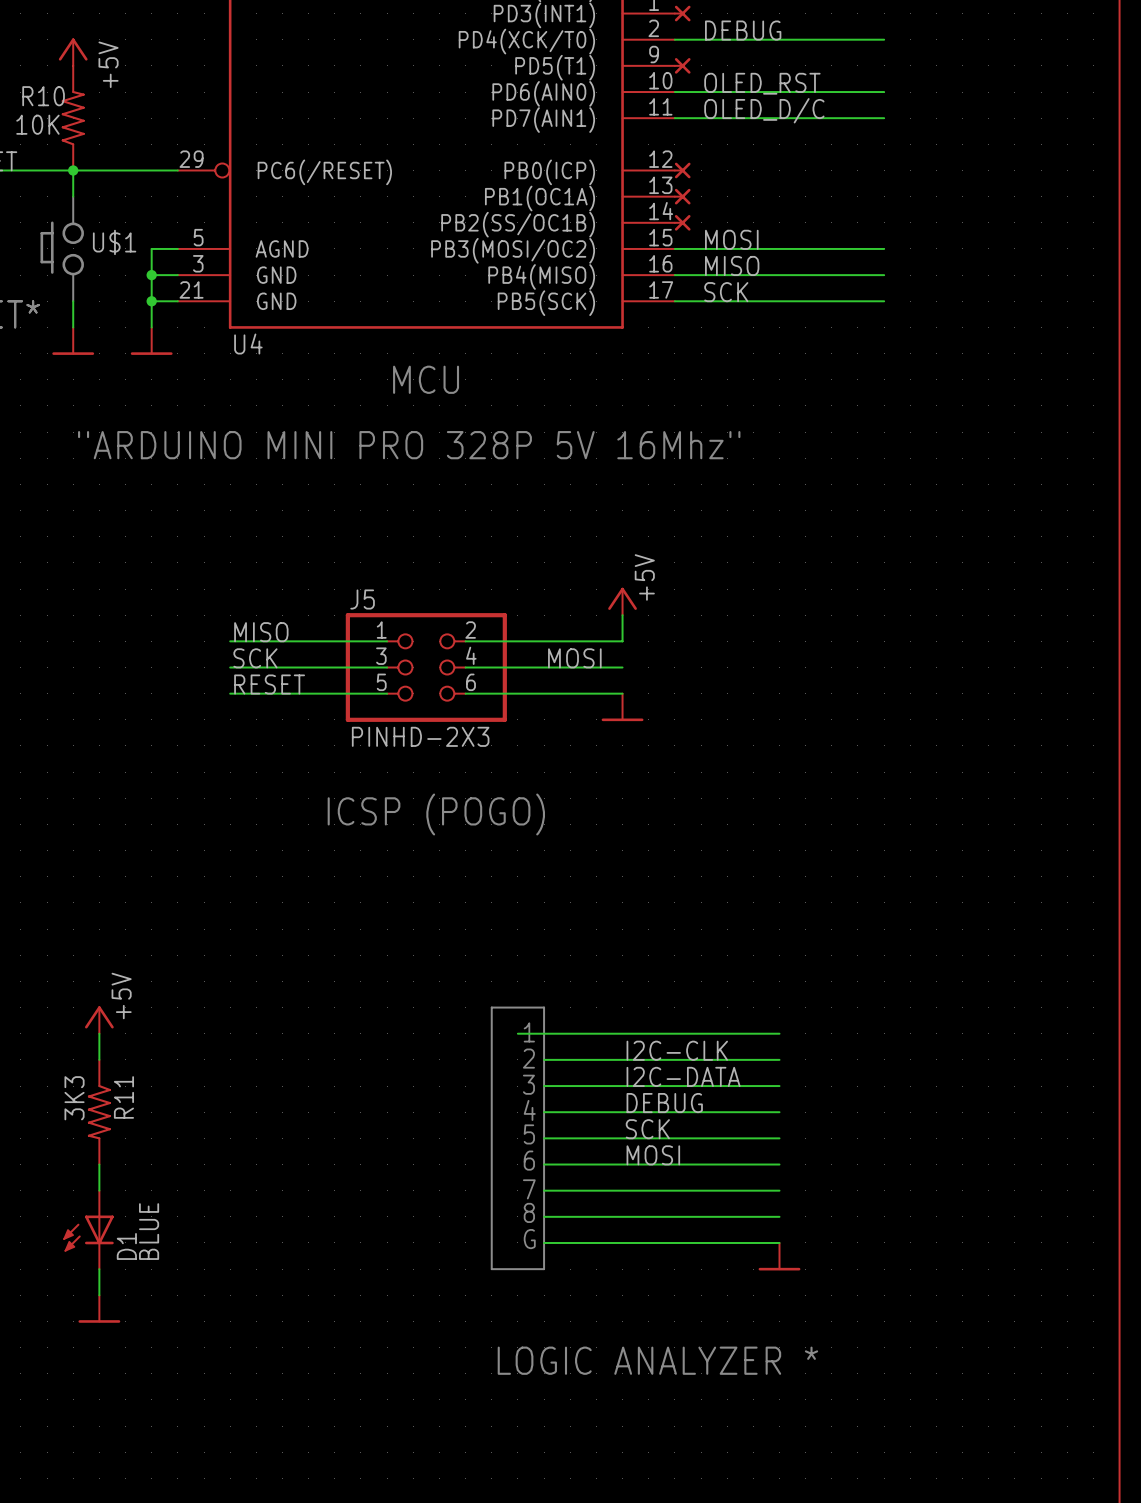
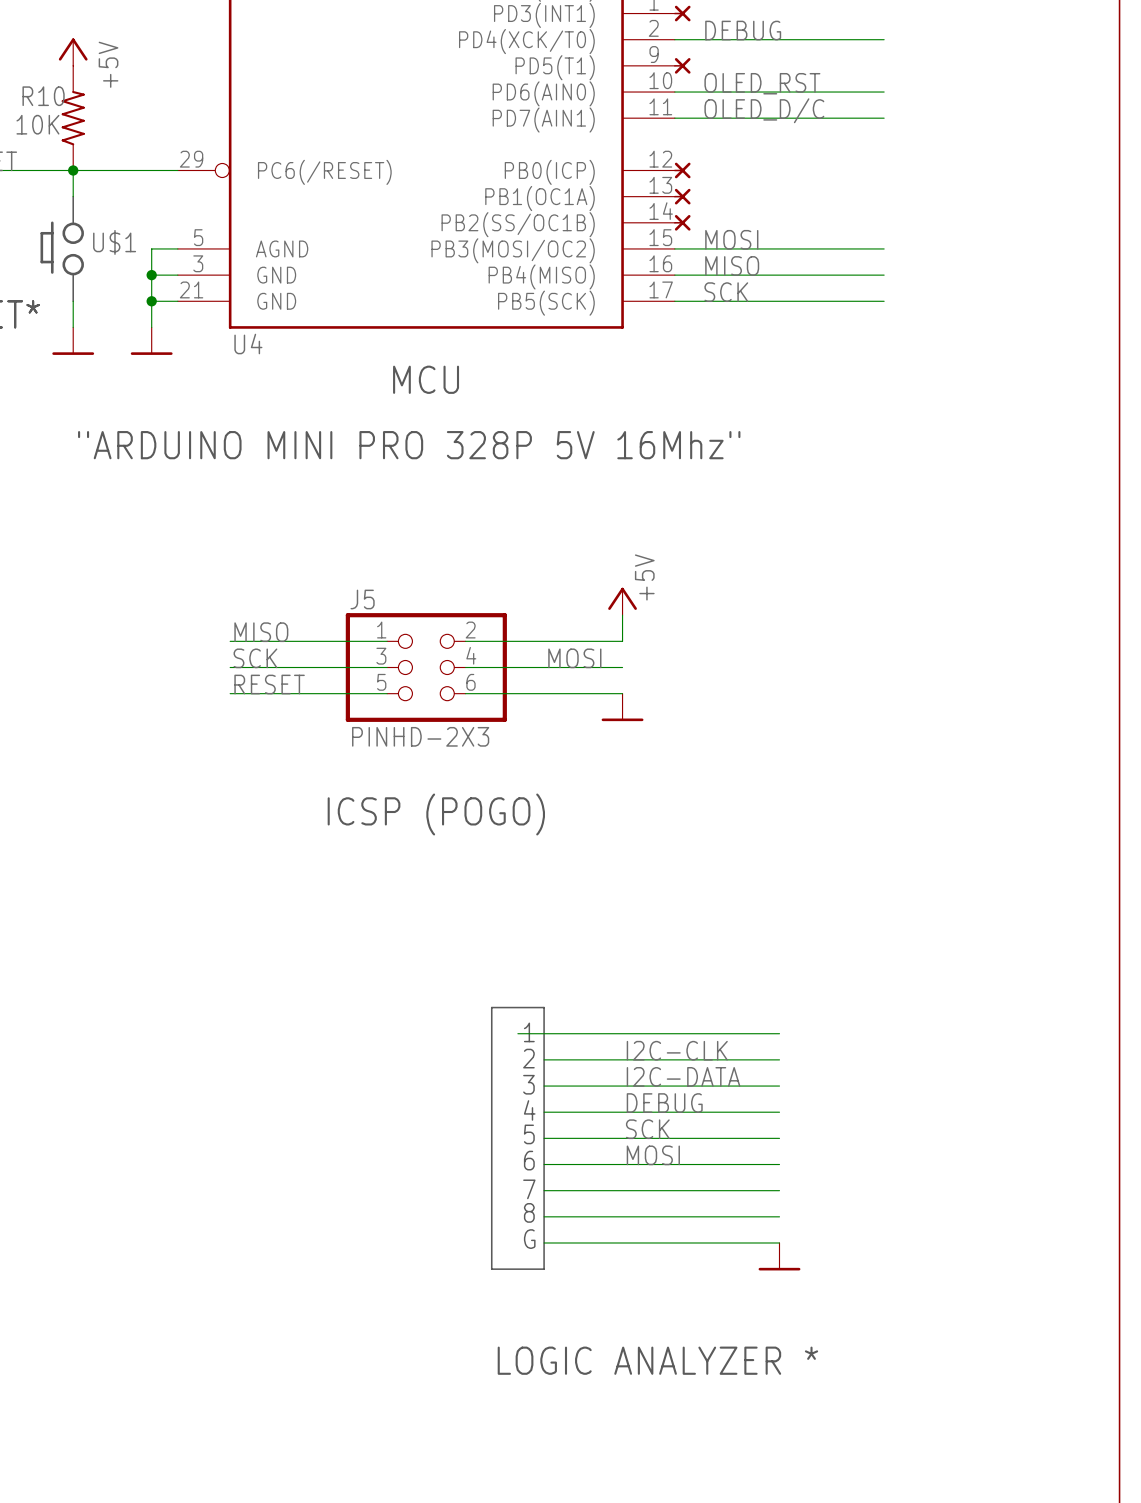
power symbol: +5V (99, 1019) -> none
wire: (99, 1033) (99, 1059) -> none
R11: 3K3 (99, 1112) -> none
wire: (99, 1164) (99, 1190) -> none
D1: BLUE (88, 1229) -> none
wire: (99, 1269) (99, 1295) -> none
power symbol: (99, 1309) -> none

